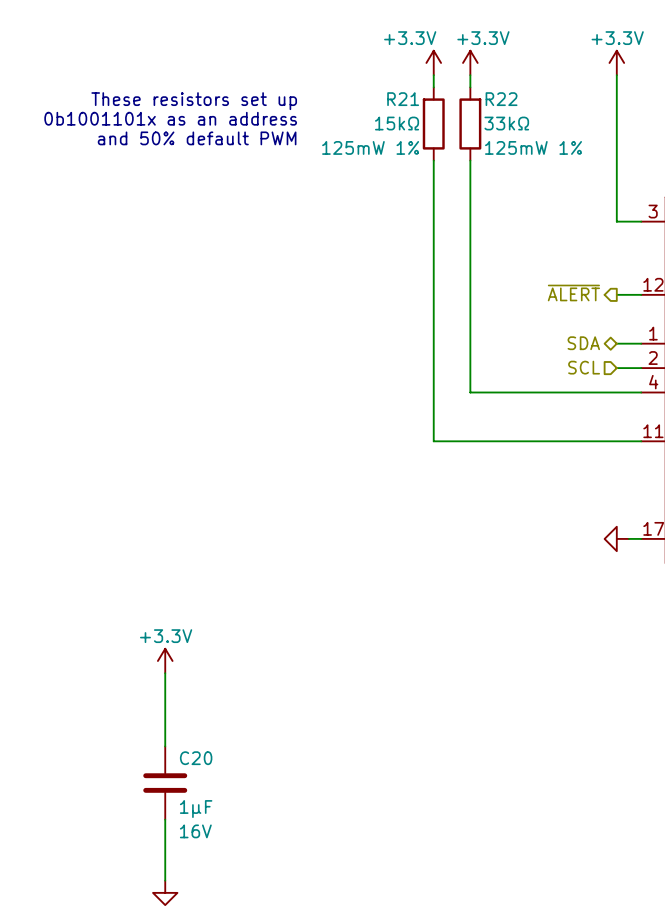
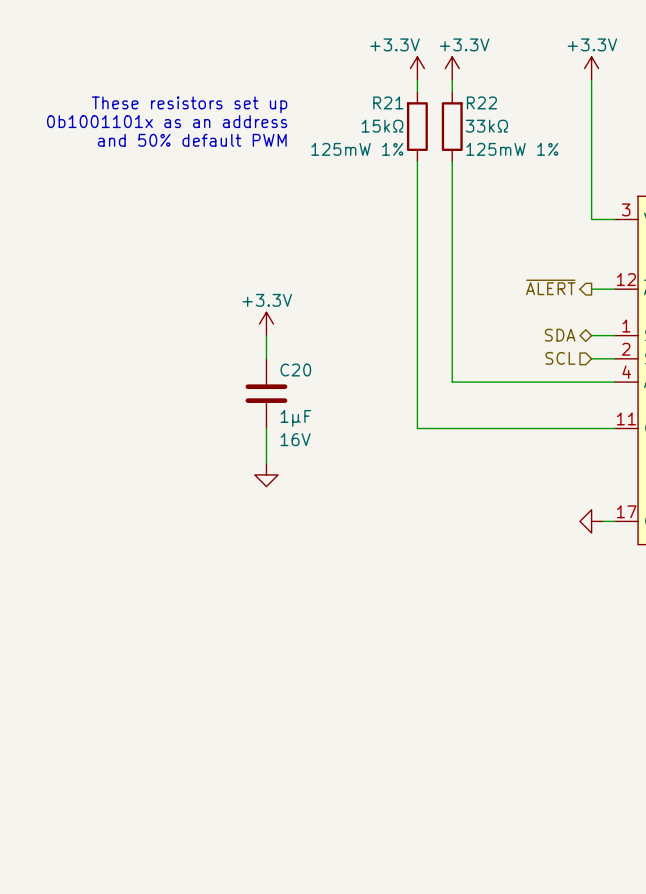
power symbol: none -> +3.3V (266, 324)
wire: none -> (266, 335) (266, 358)
wire: none -> (266, 428) (266, 463)
power symbol: none -> (266, 474)
power symbol: +3.3V (165, 660) -> none
wire: (165, 673) (165, 746) -> none
C20 position: (165, 783) -> (266, 393)
wire: (165, 819) (165, 880) -> none
power symbol: (165, 892) -> none

